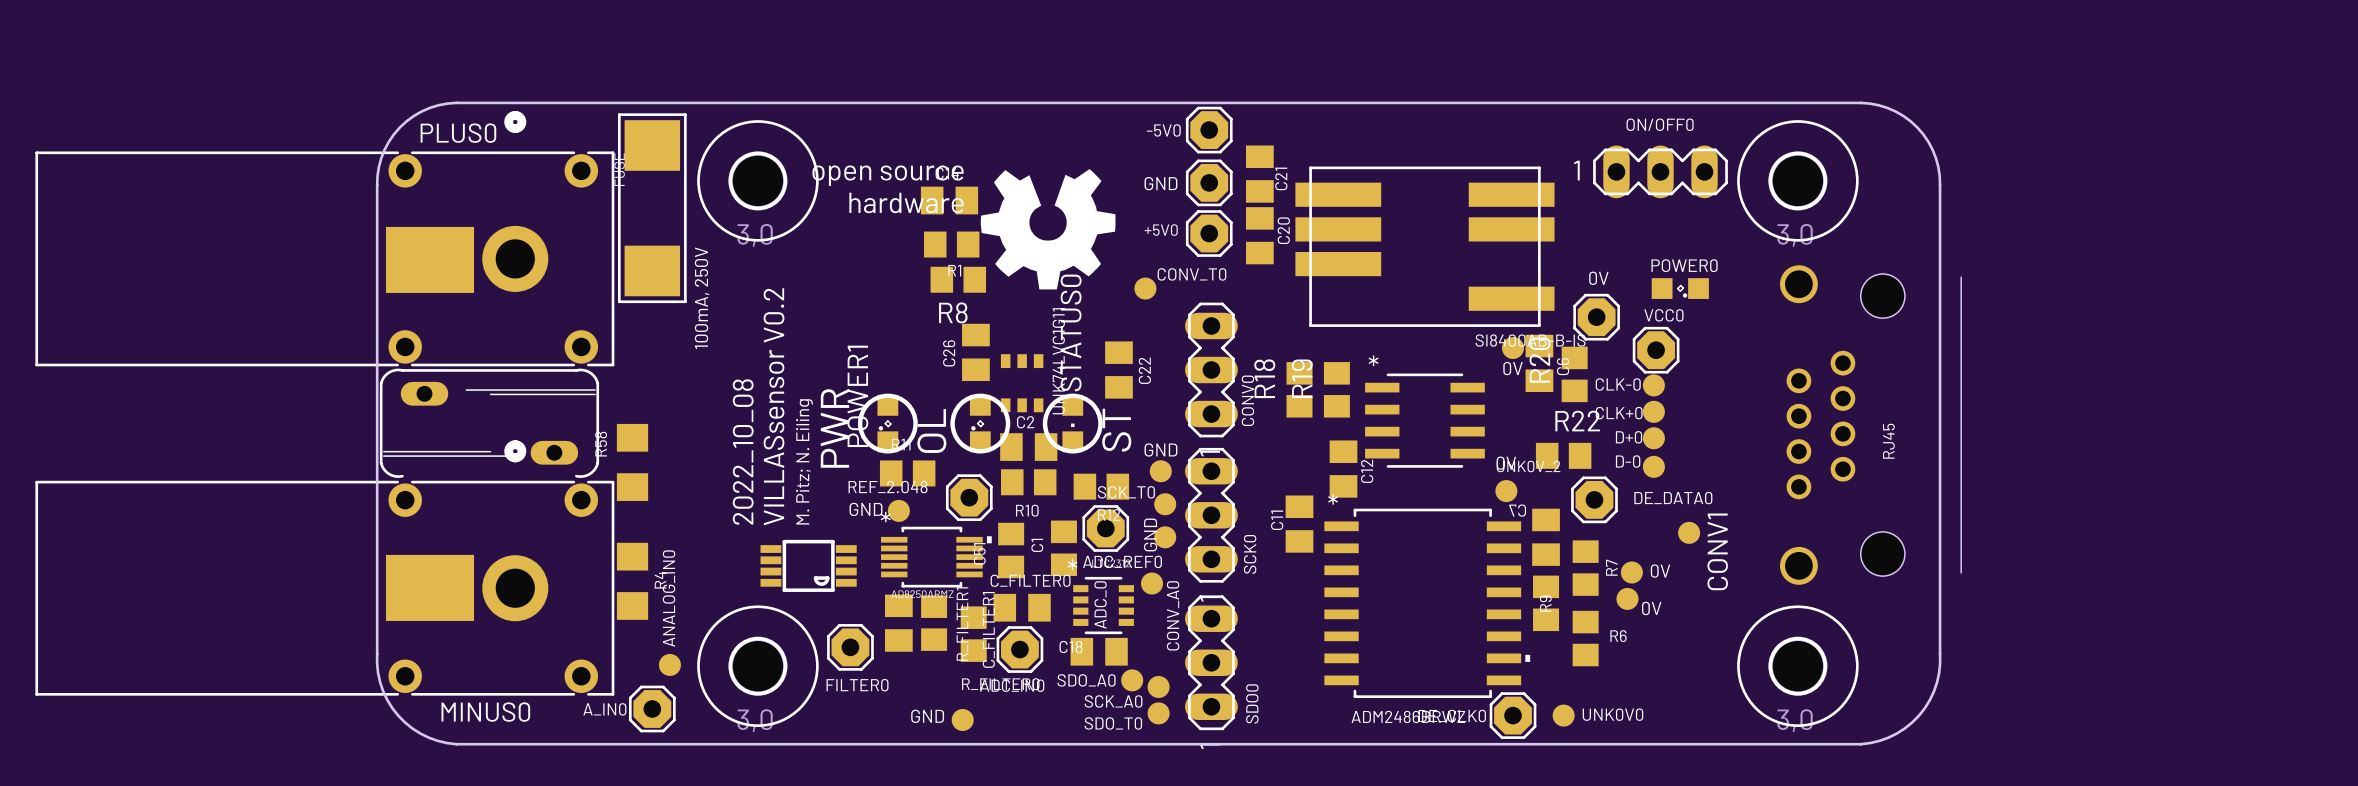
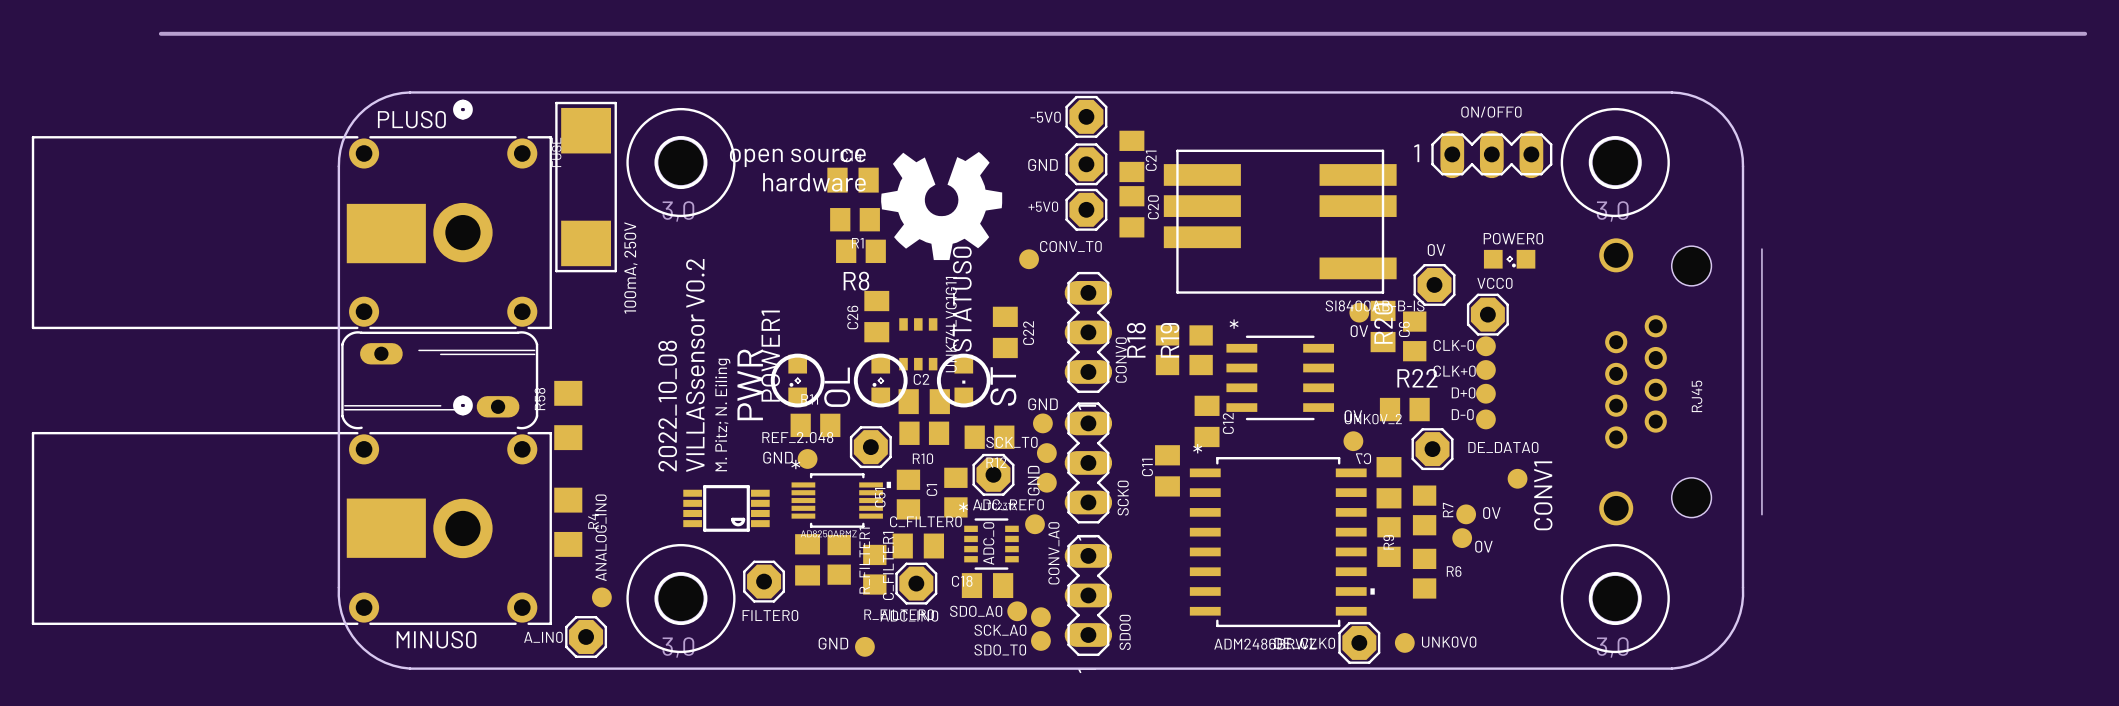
line: none -> (160, 33) (2085, 33)

